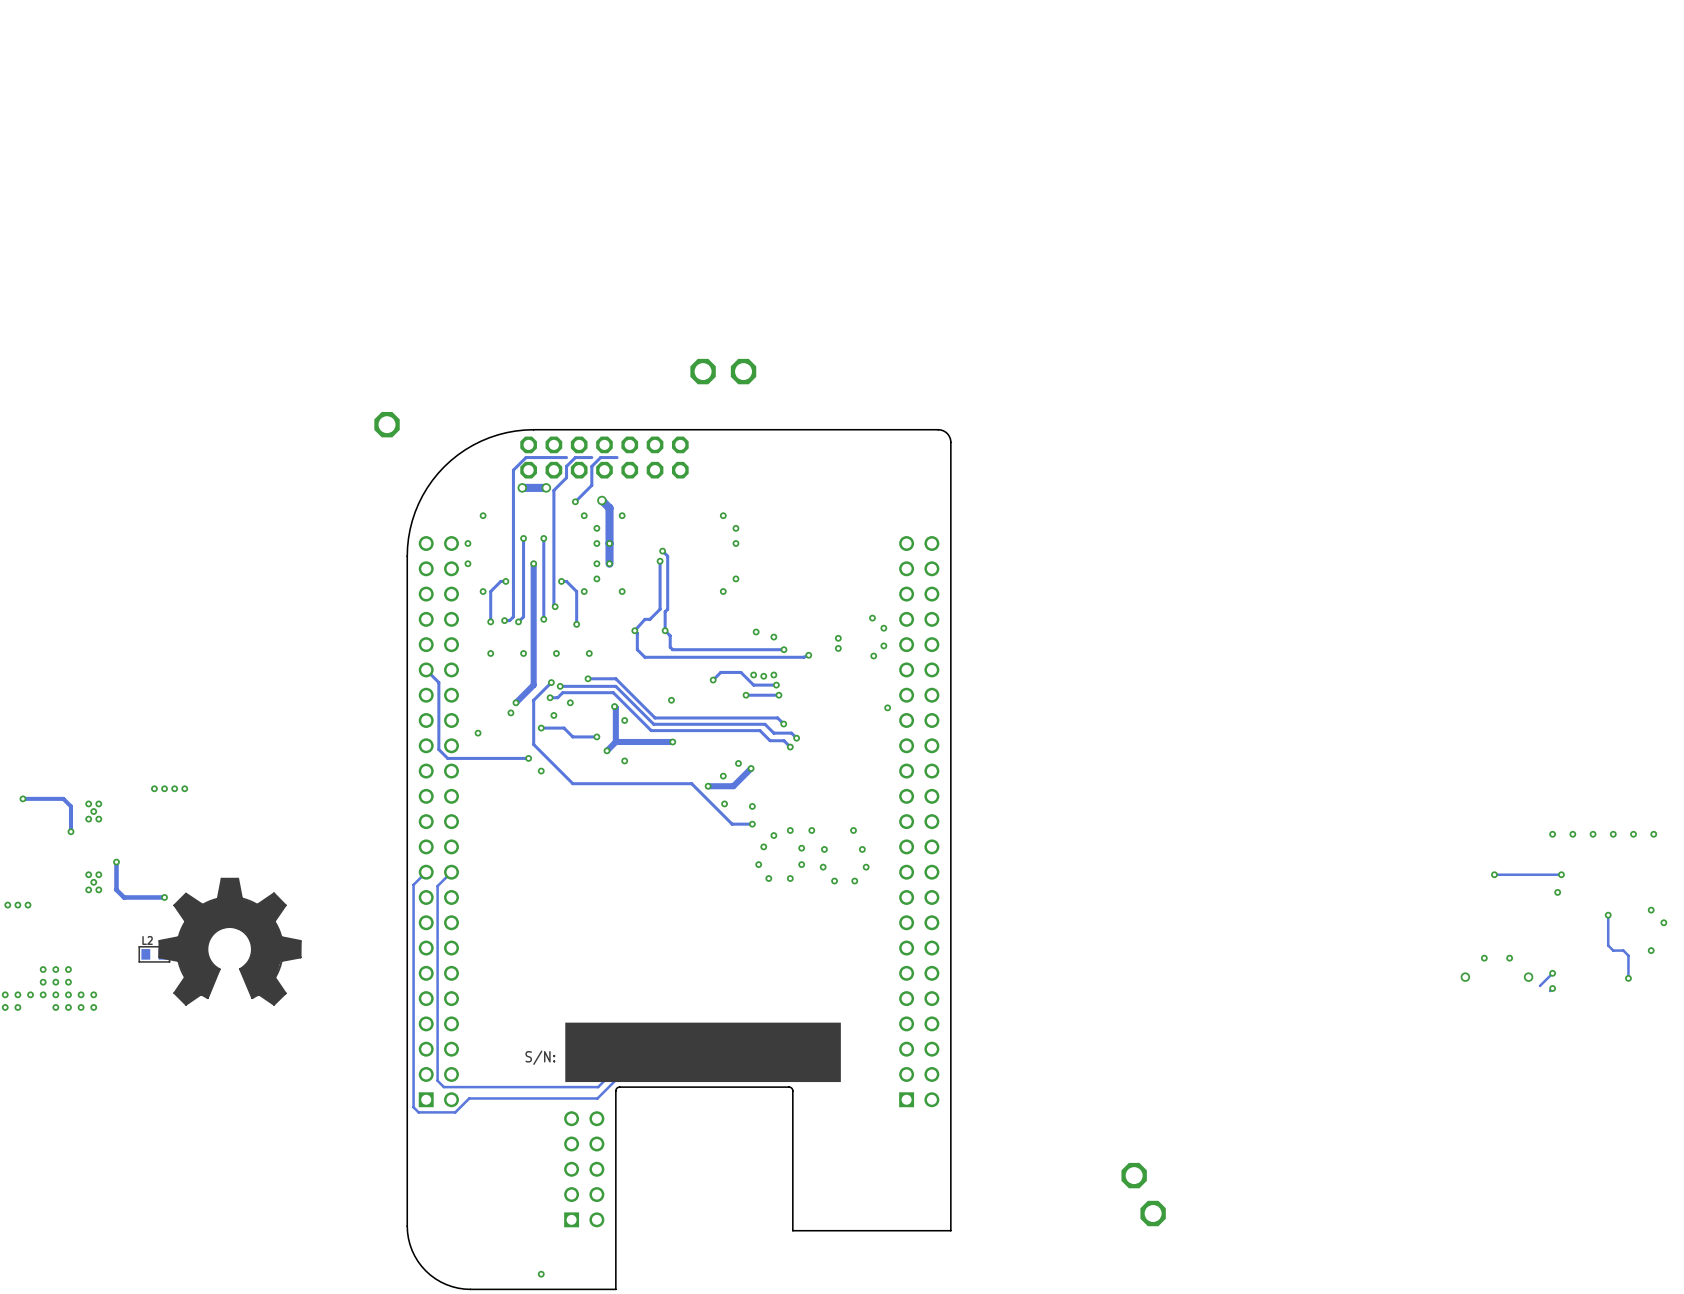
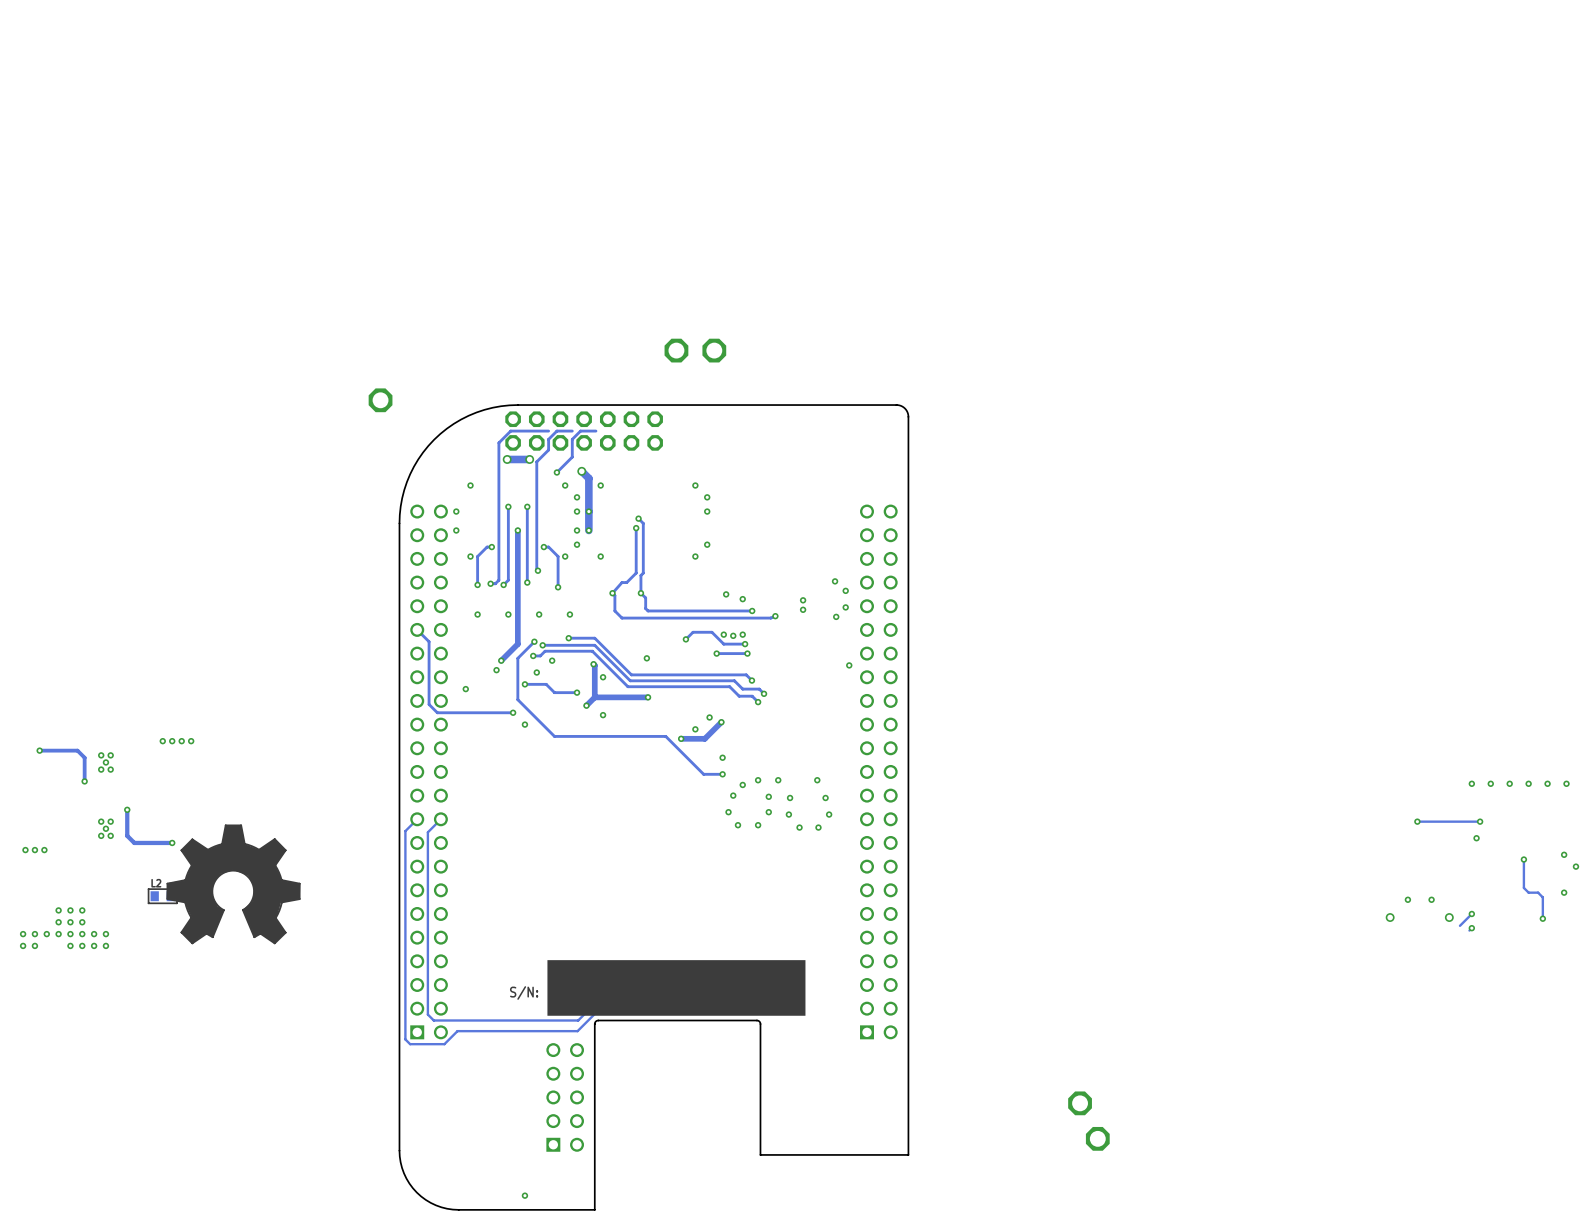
via: (724, 803) -> none

